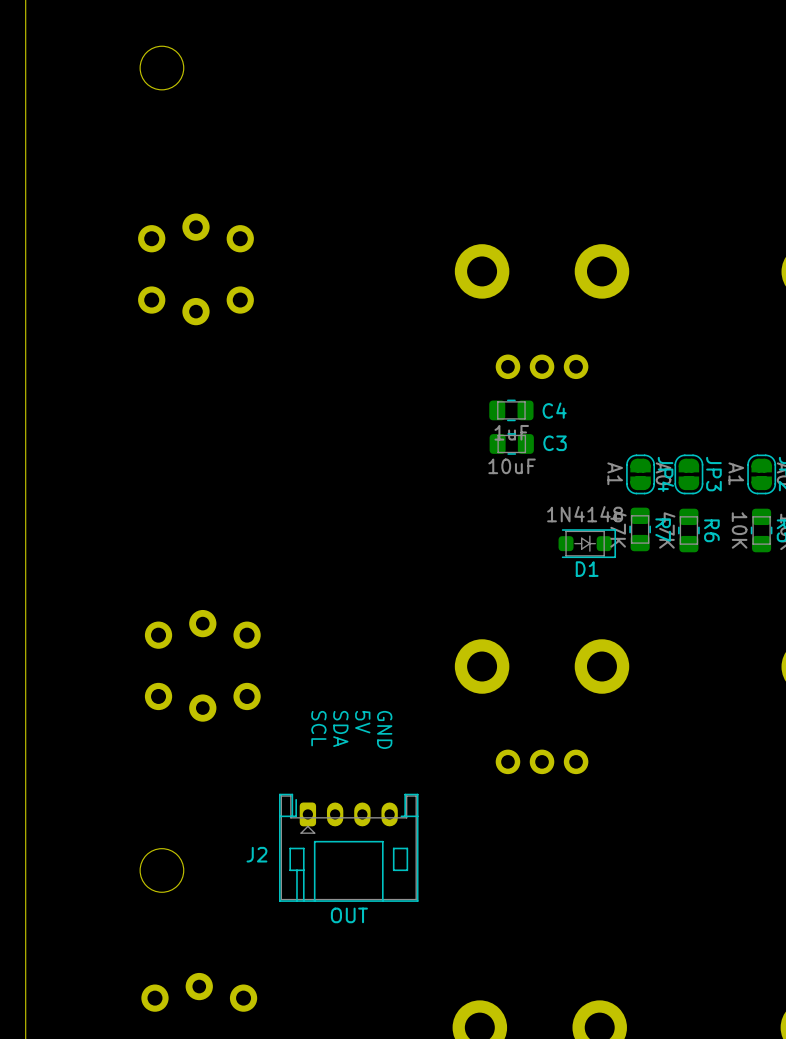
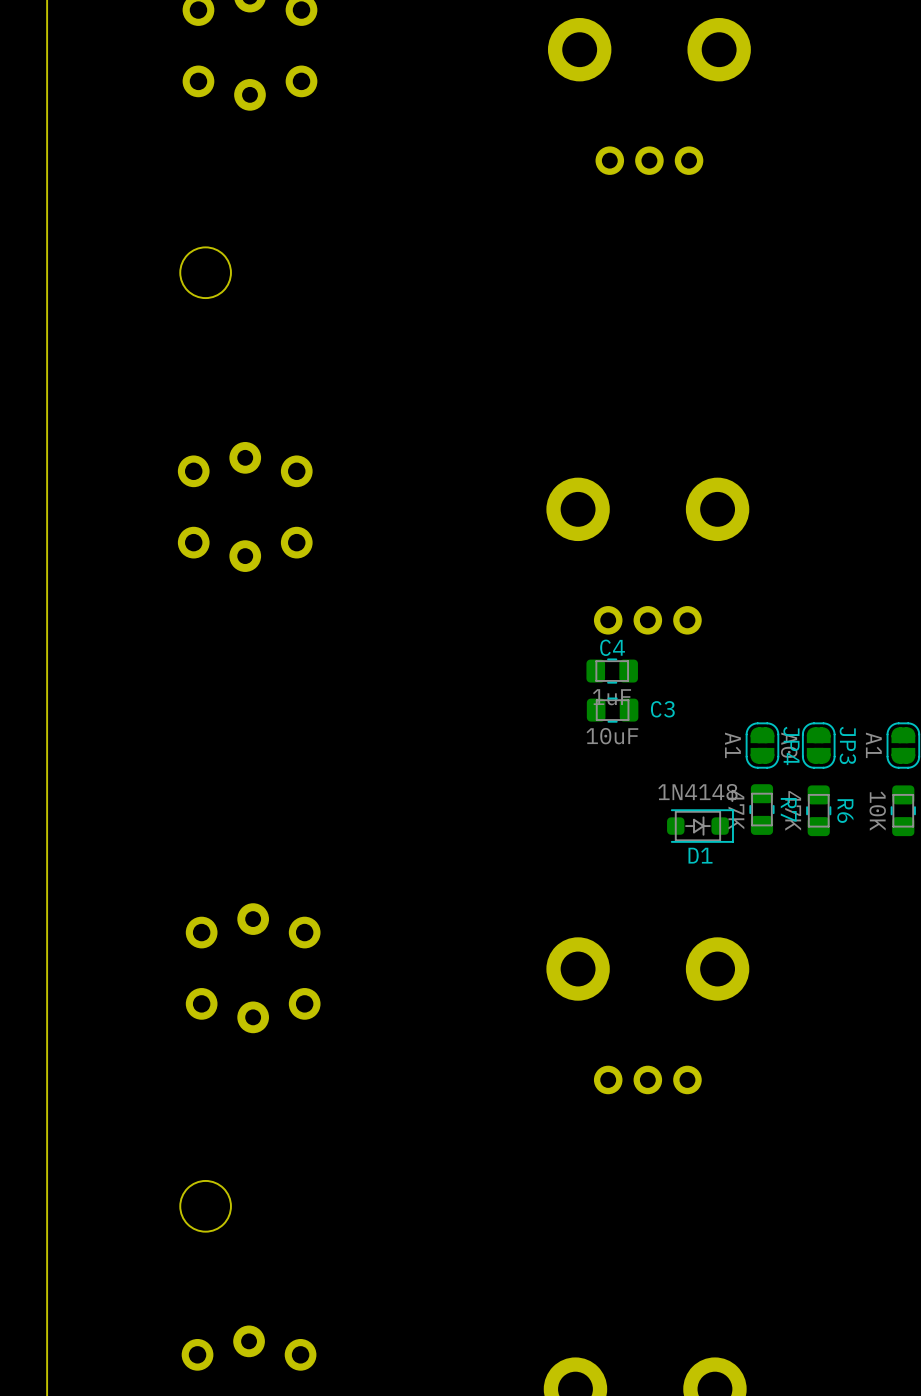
C4 name position: C4 (554, 410) -> C4 (612, 647)
text: 5V (362, 722) -> none
text: SCL (318, 728) -> none
text: SDA (340, 728) -> none
text: GND (384, 729) -> none
J2: OUT (348, 847) -> none

